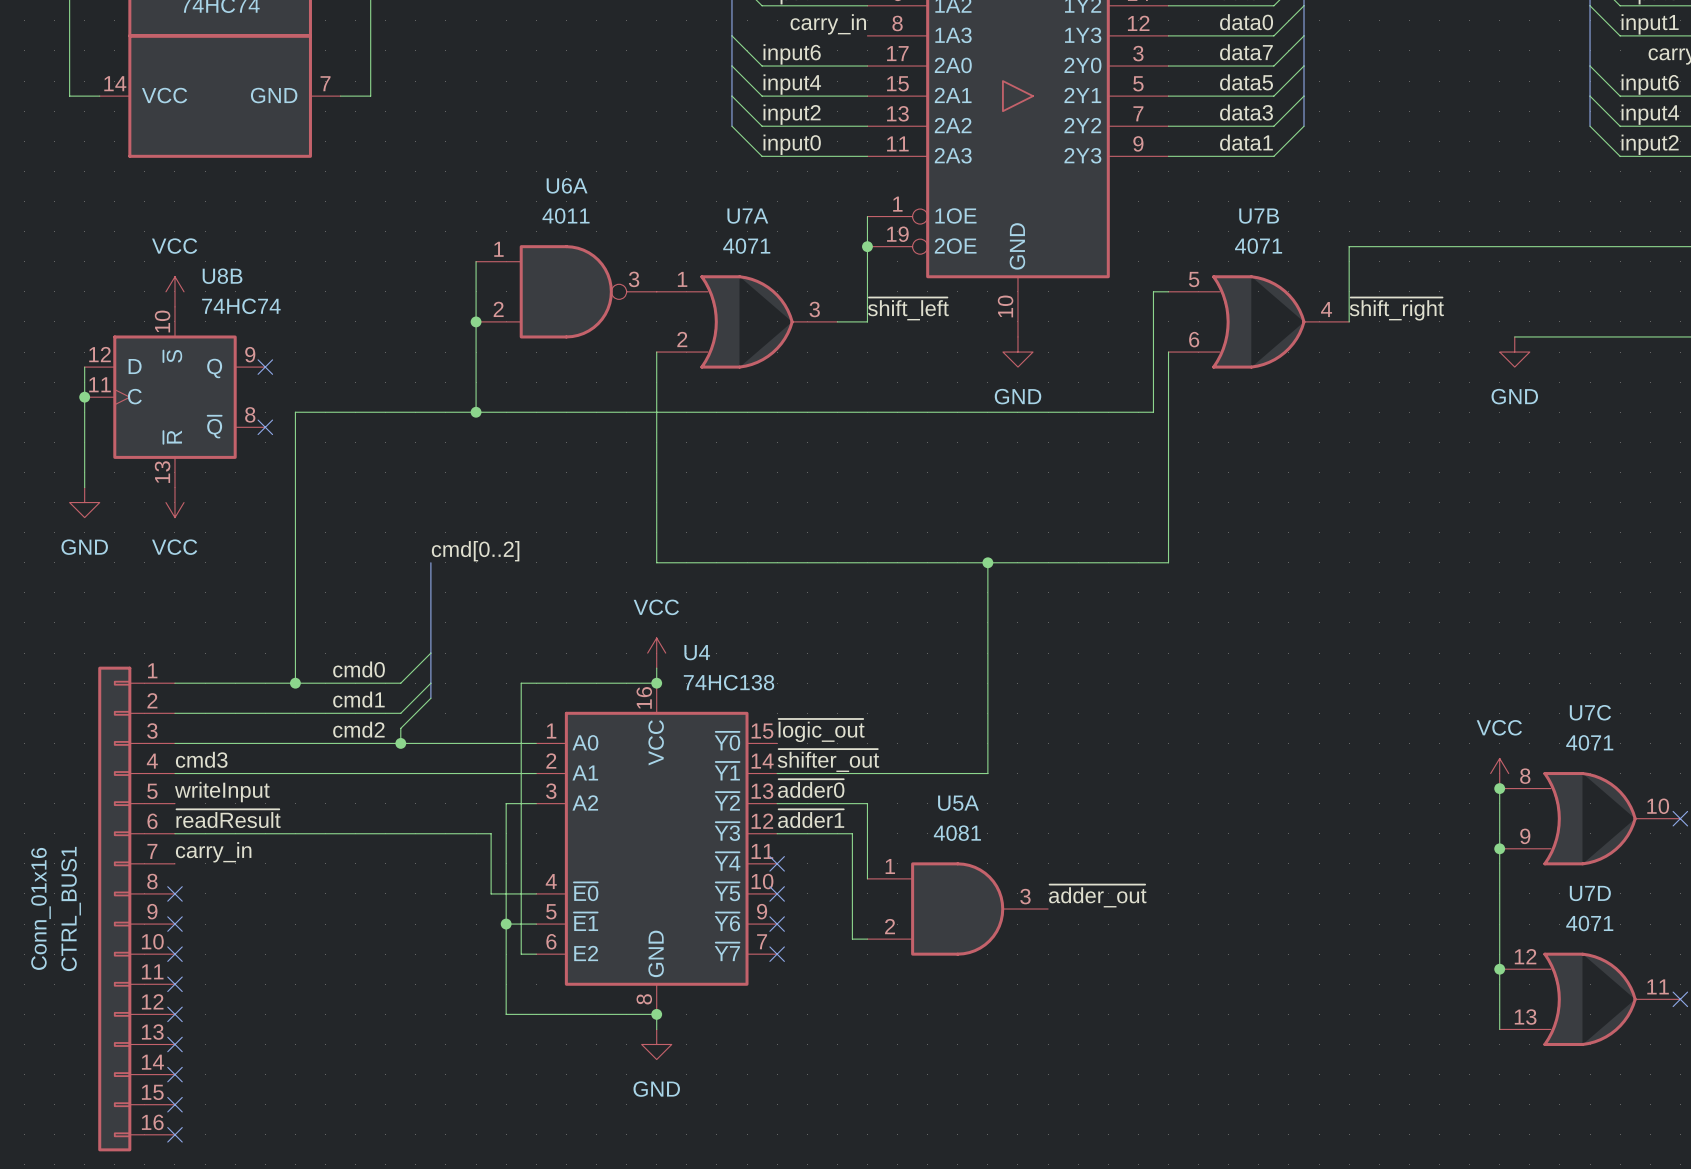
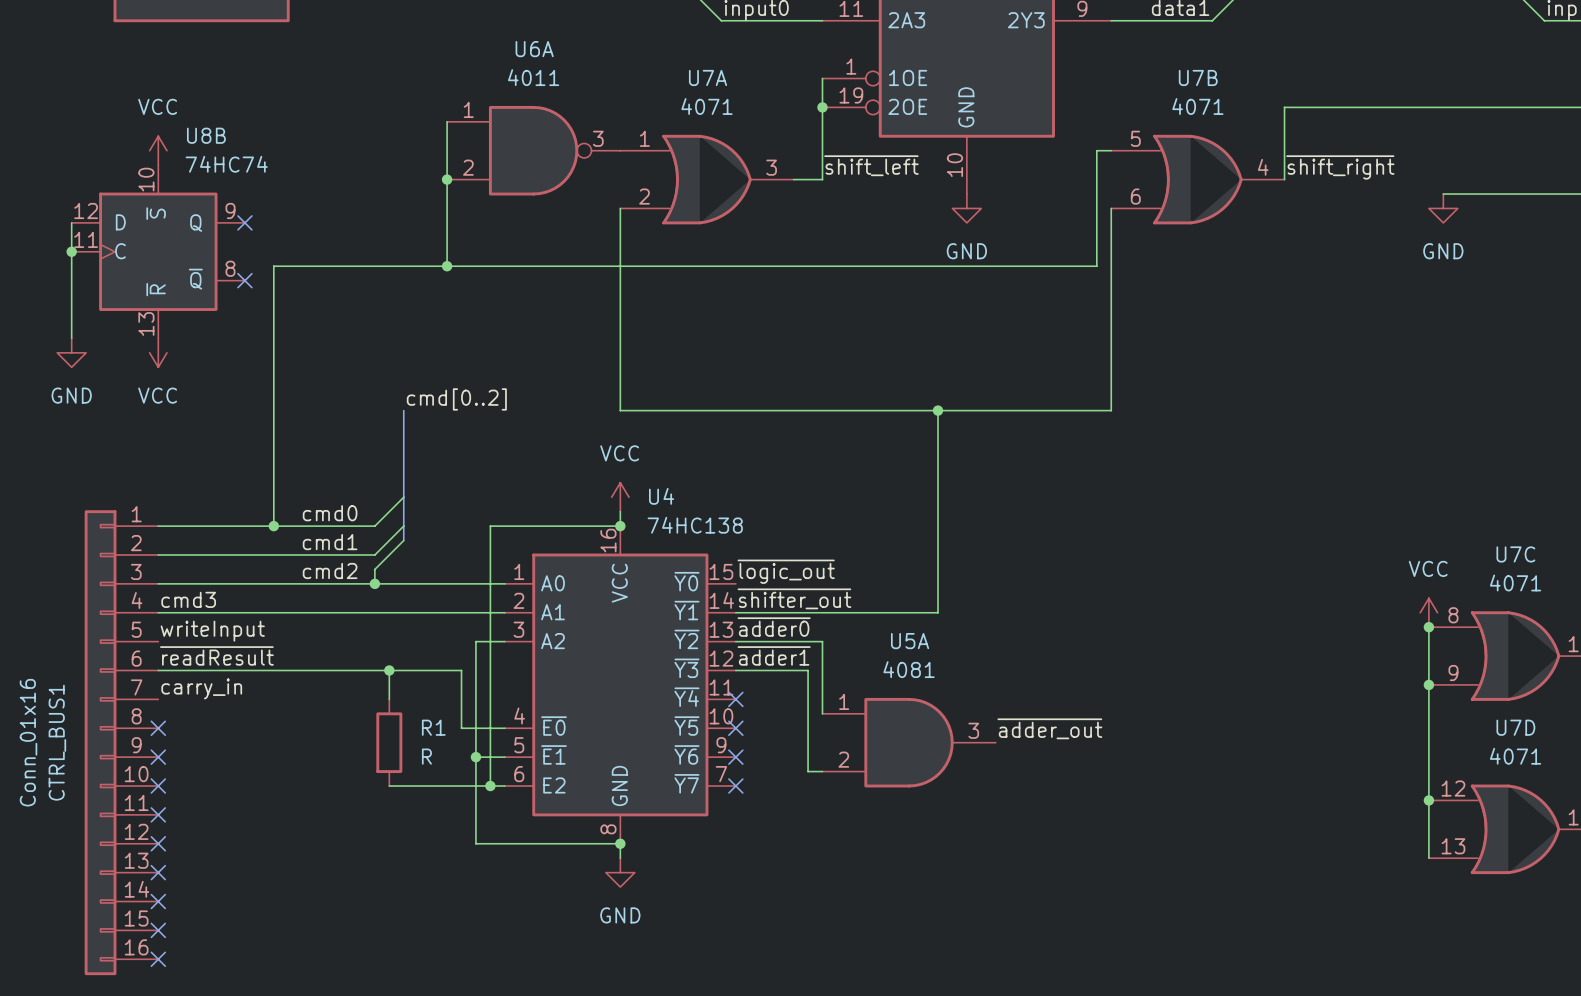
wire: none -> (389, 670) (389, 699)
junction: none -> (389, 670)
R1: none -> R (389, 742)
wire: none -> (389, 786) (490, 786)
junction: none -> (490, 786)

